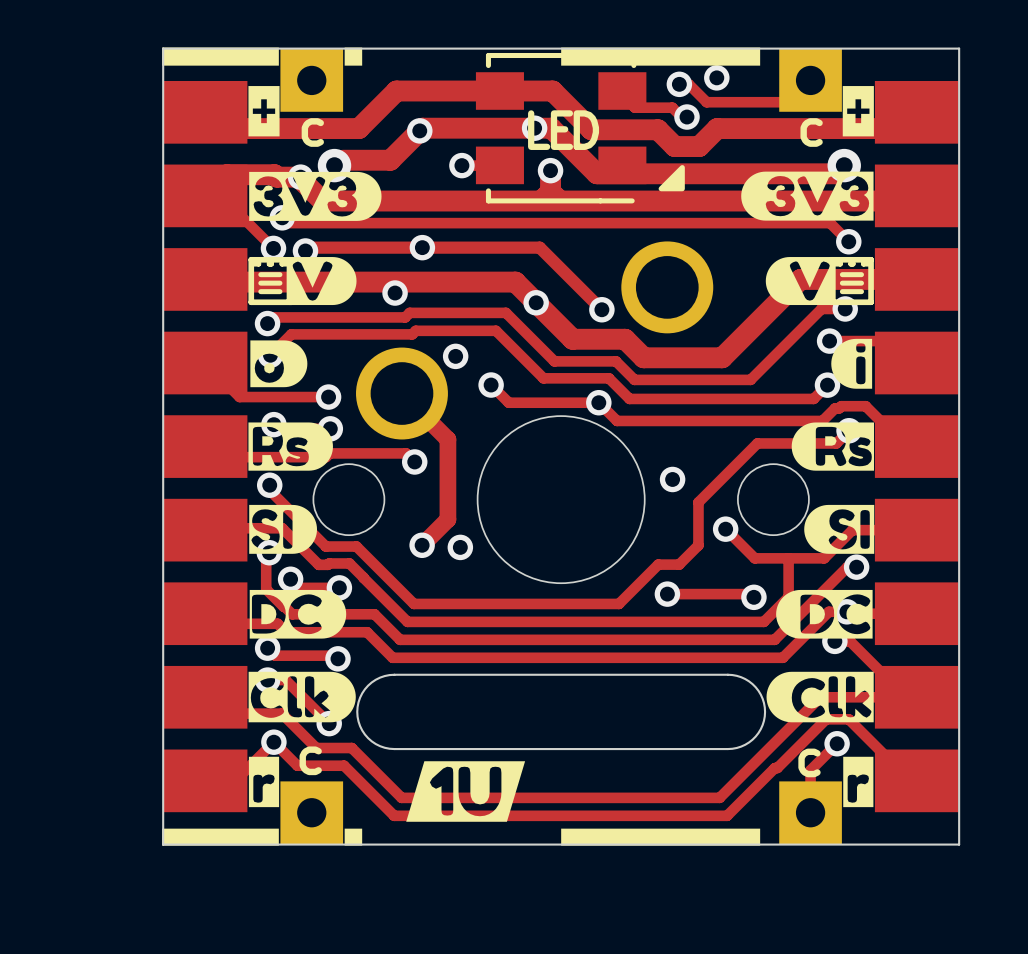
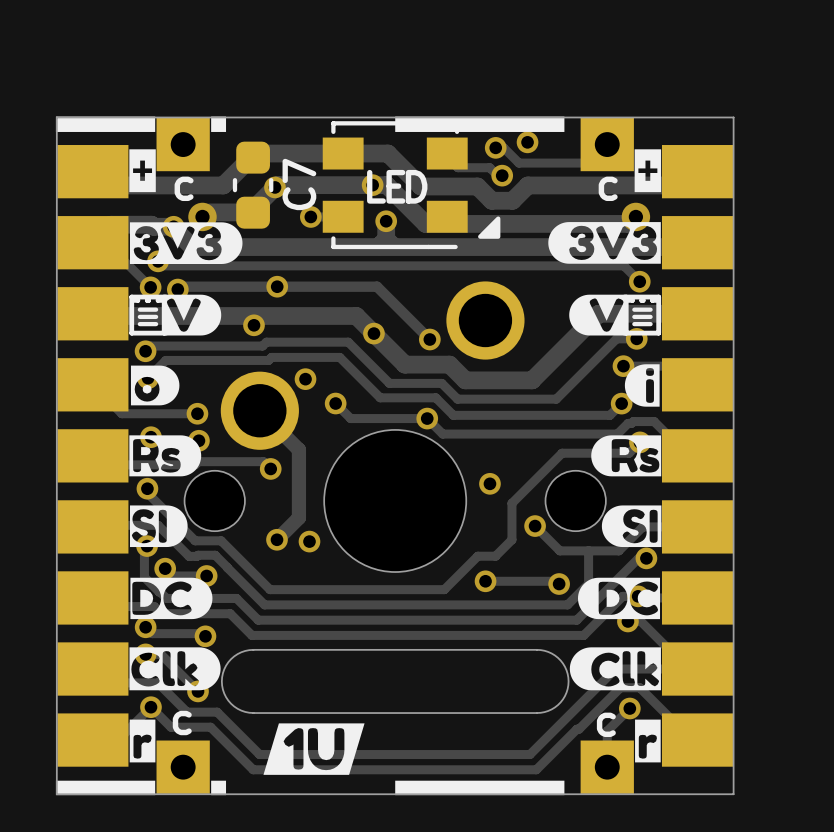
C7: none -> (253, 185)

